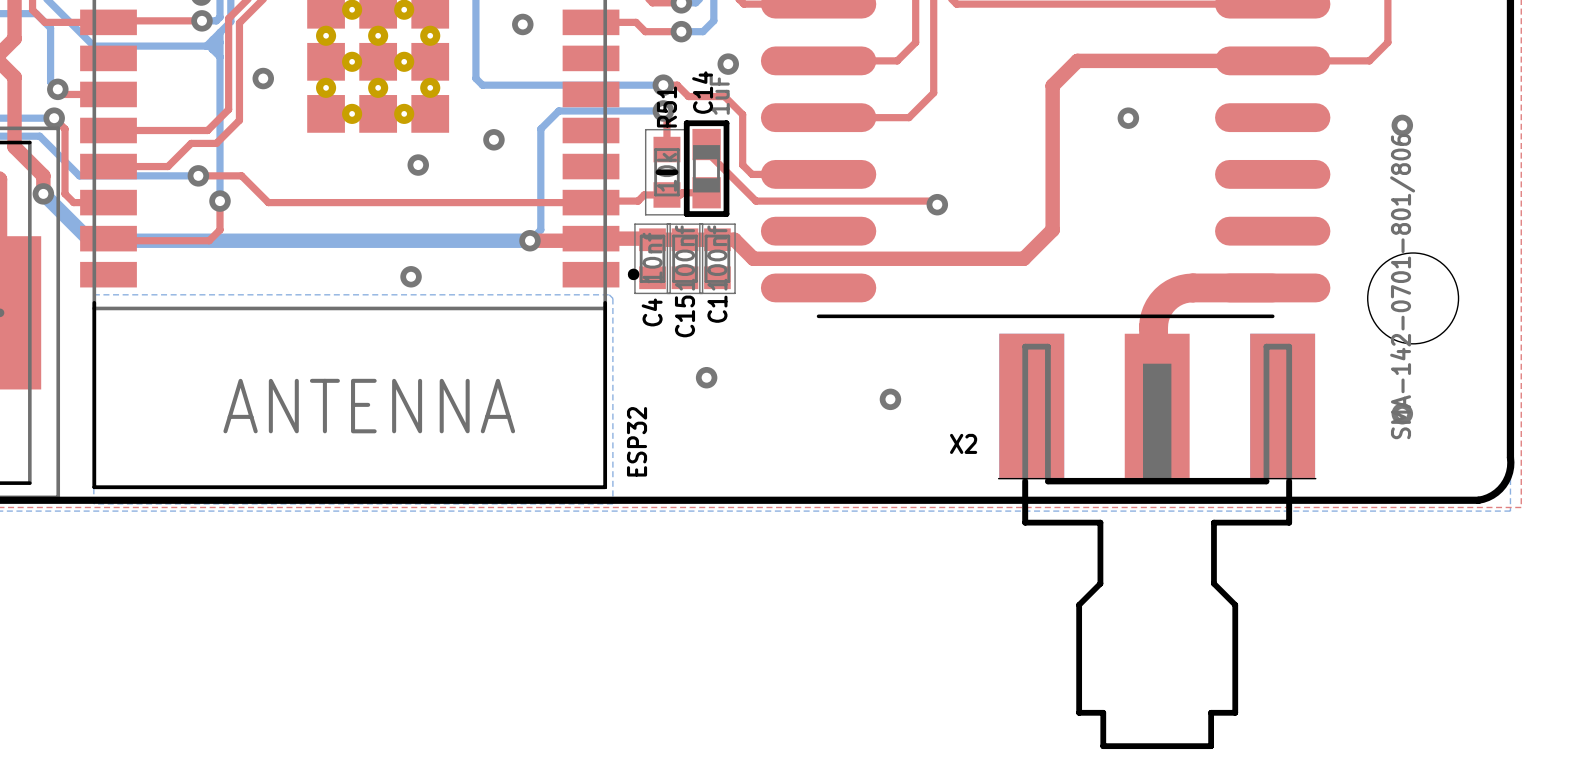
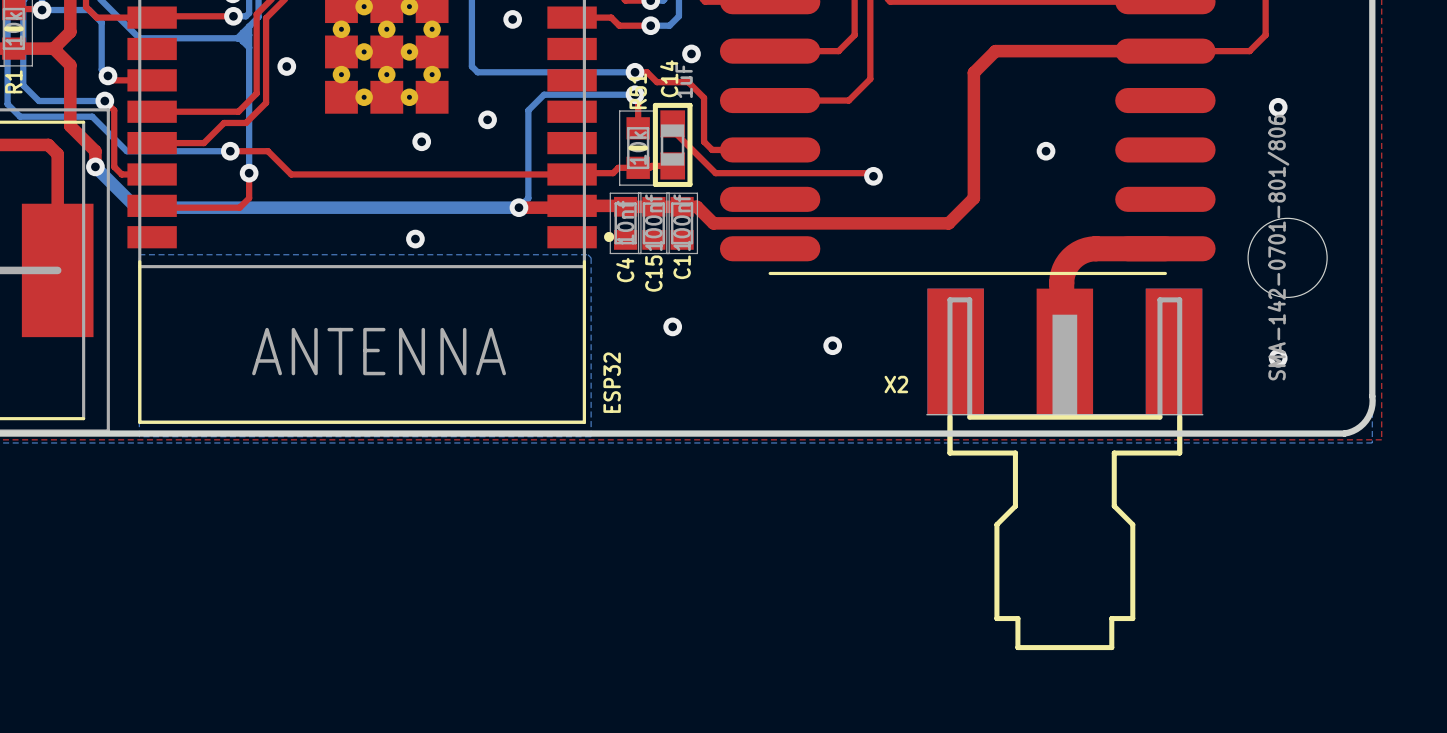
via position: (1128, 118) -> (1046, 151)

